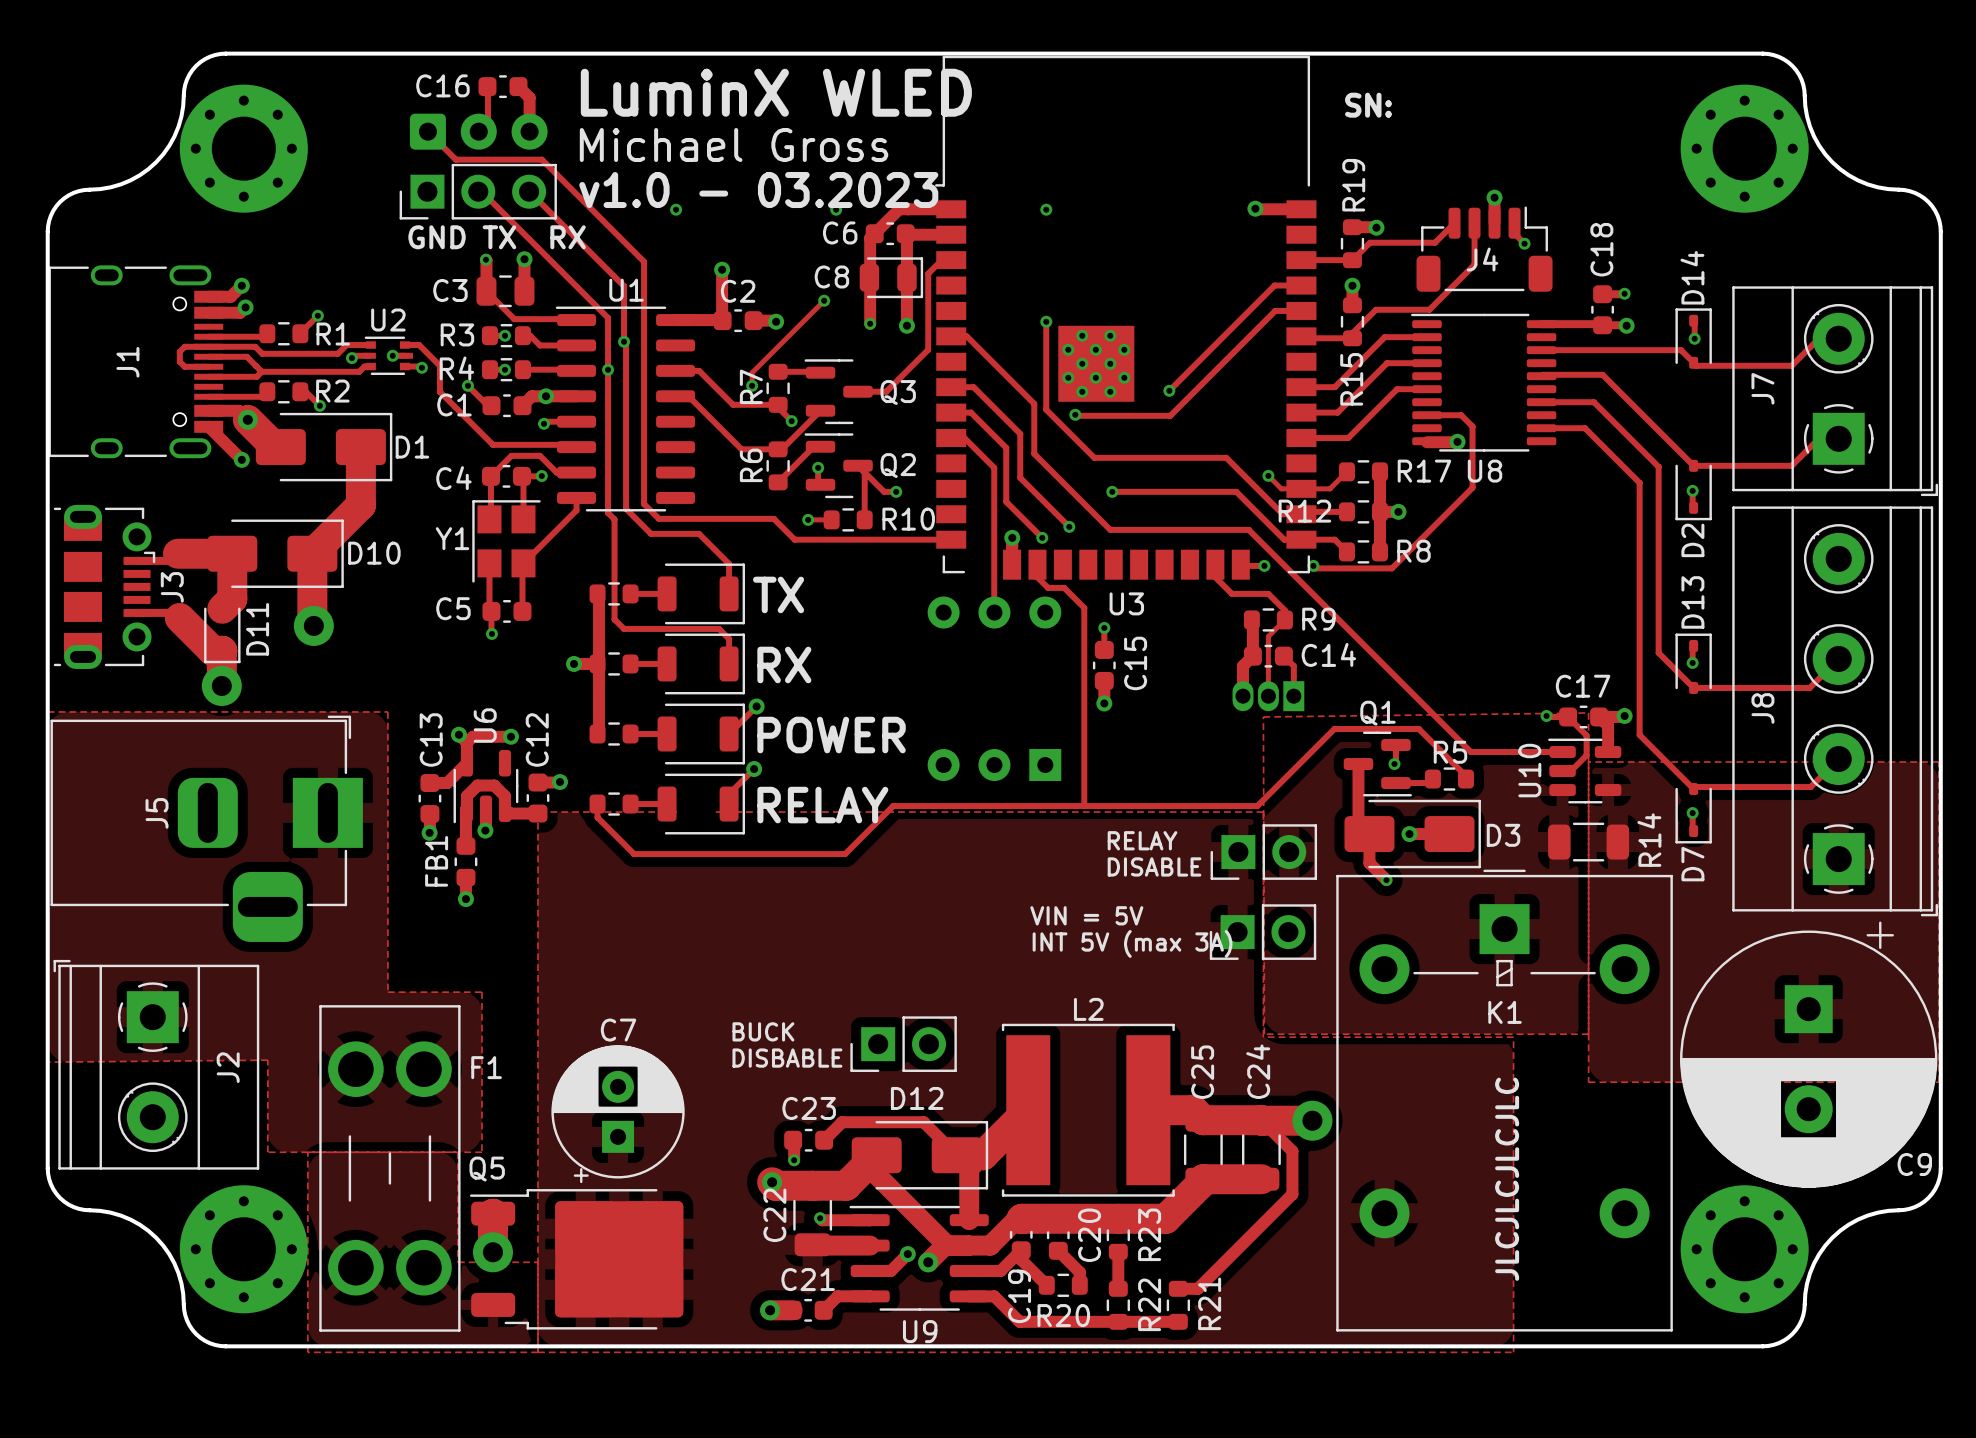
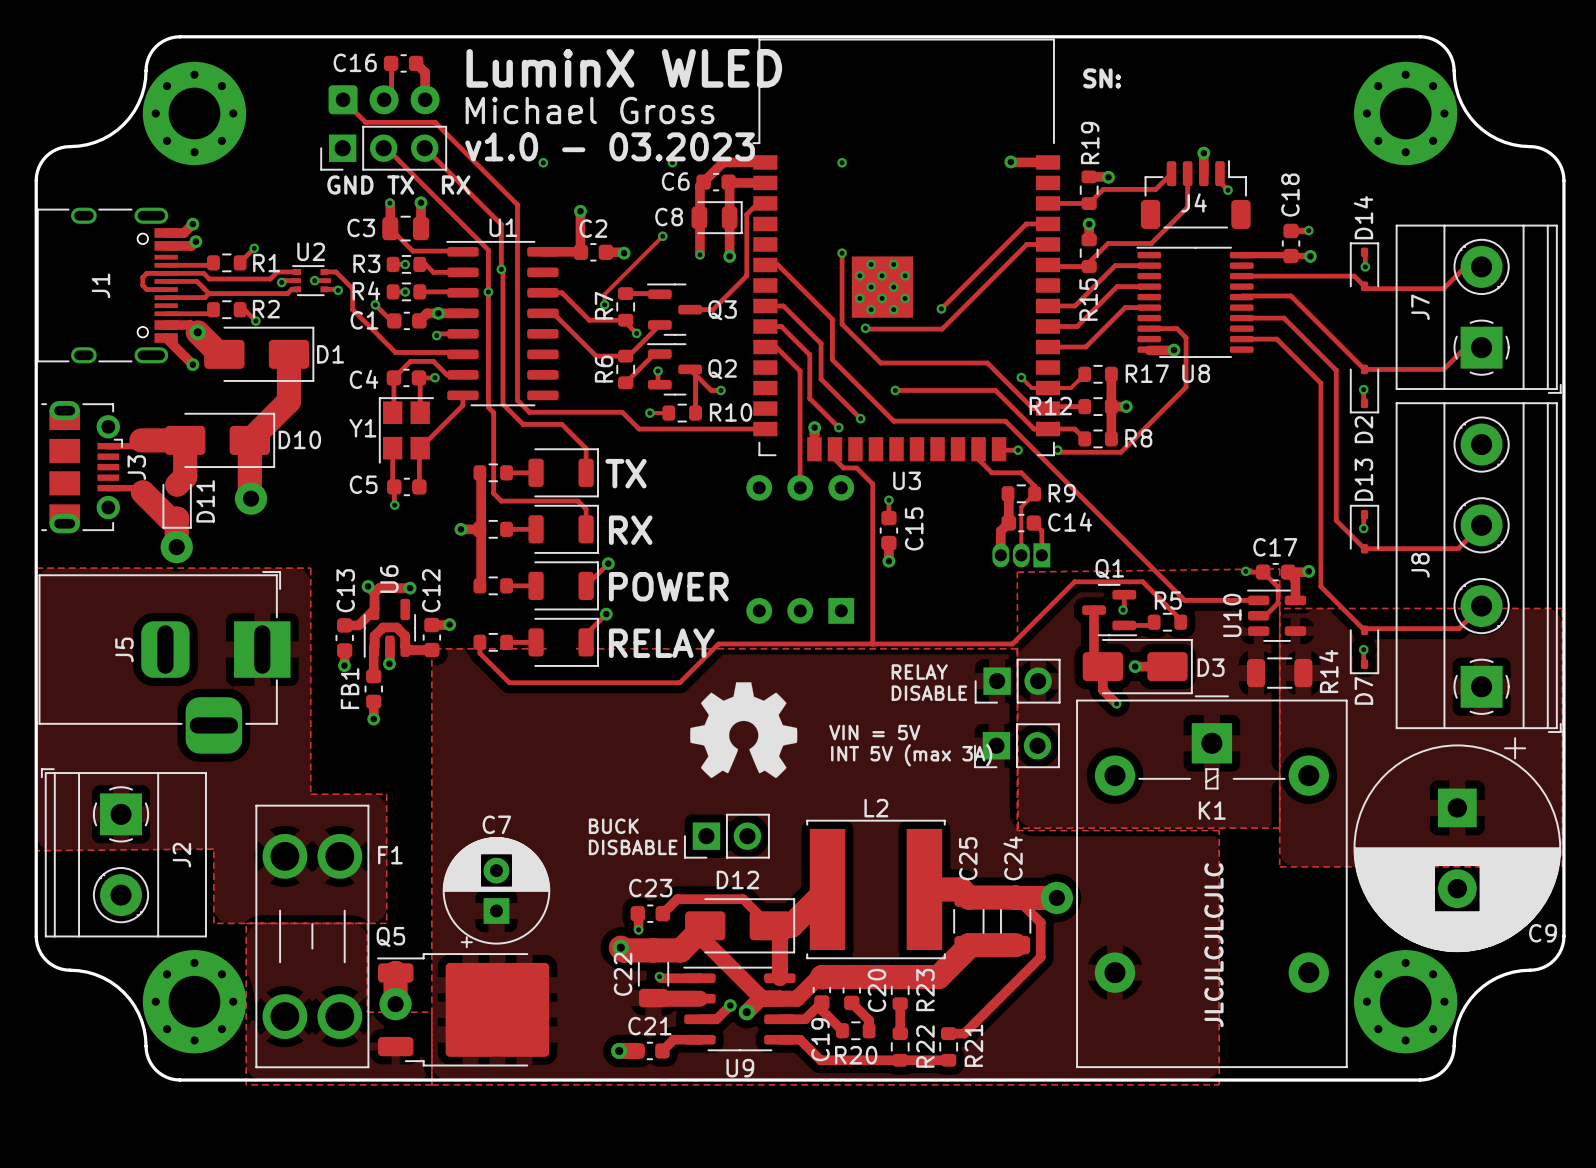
drawing: none -> [690, 682, 798, 779]

